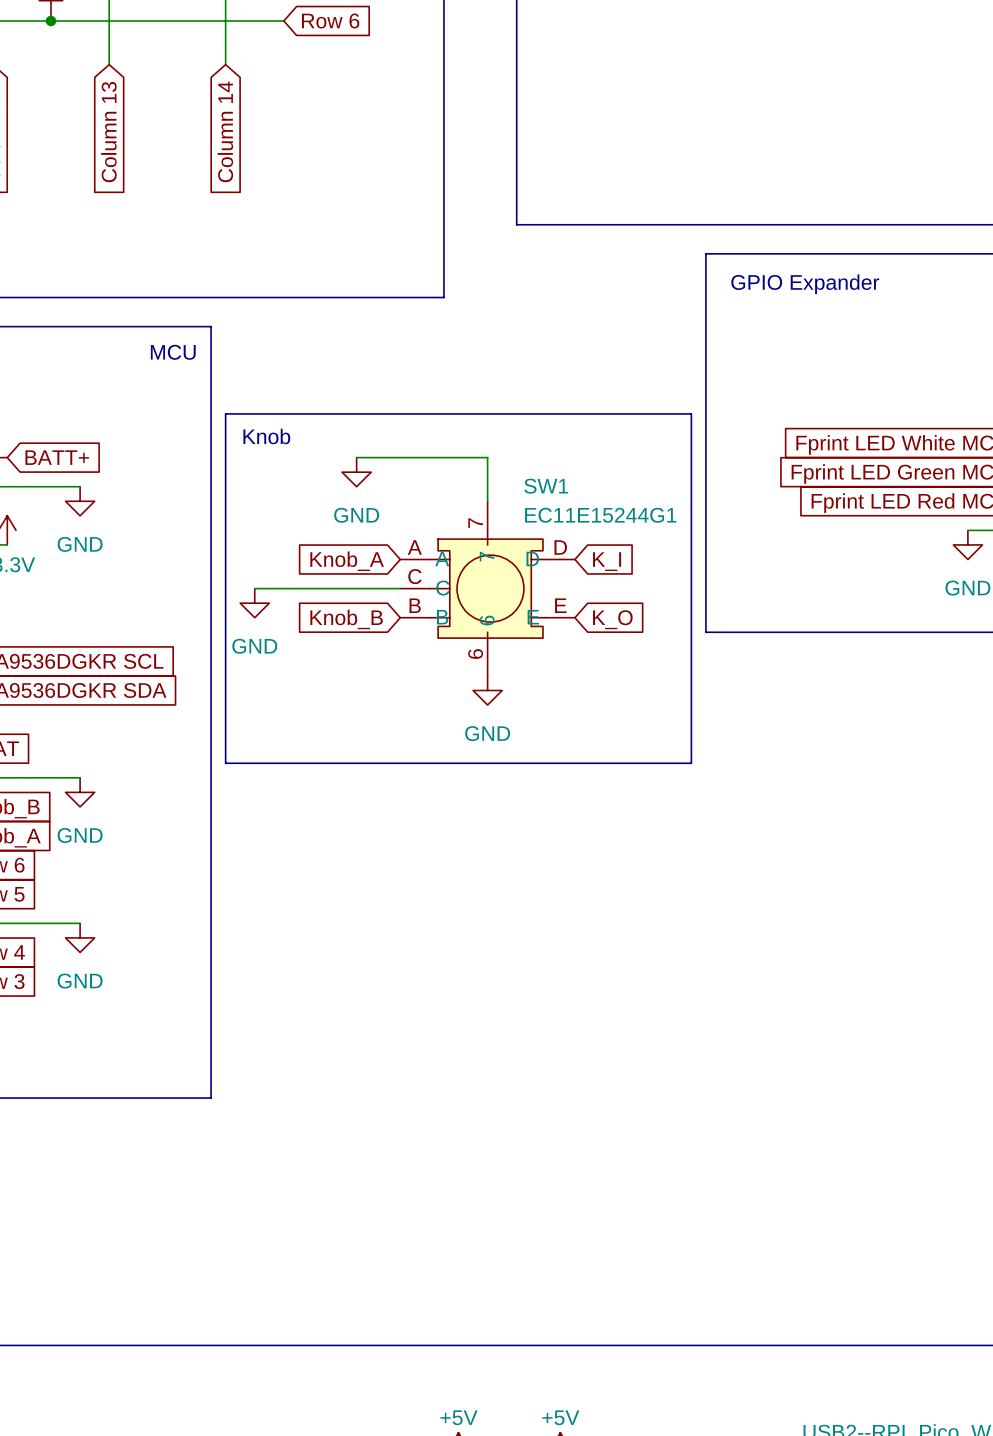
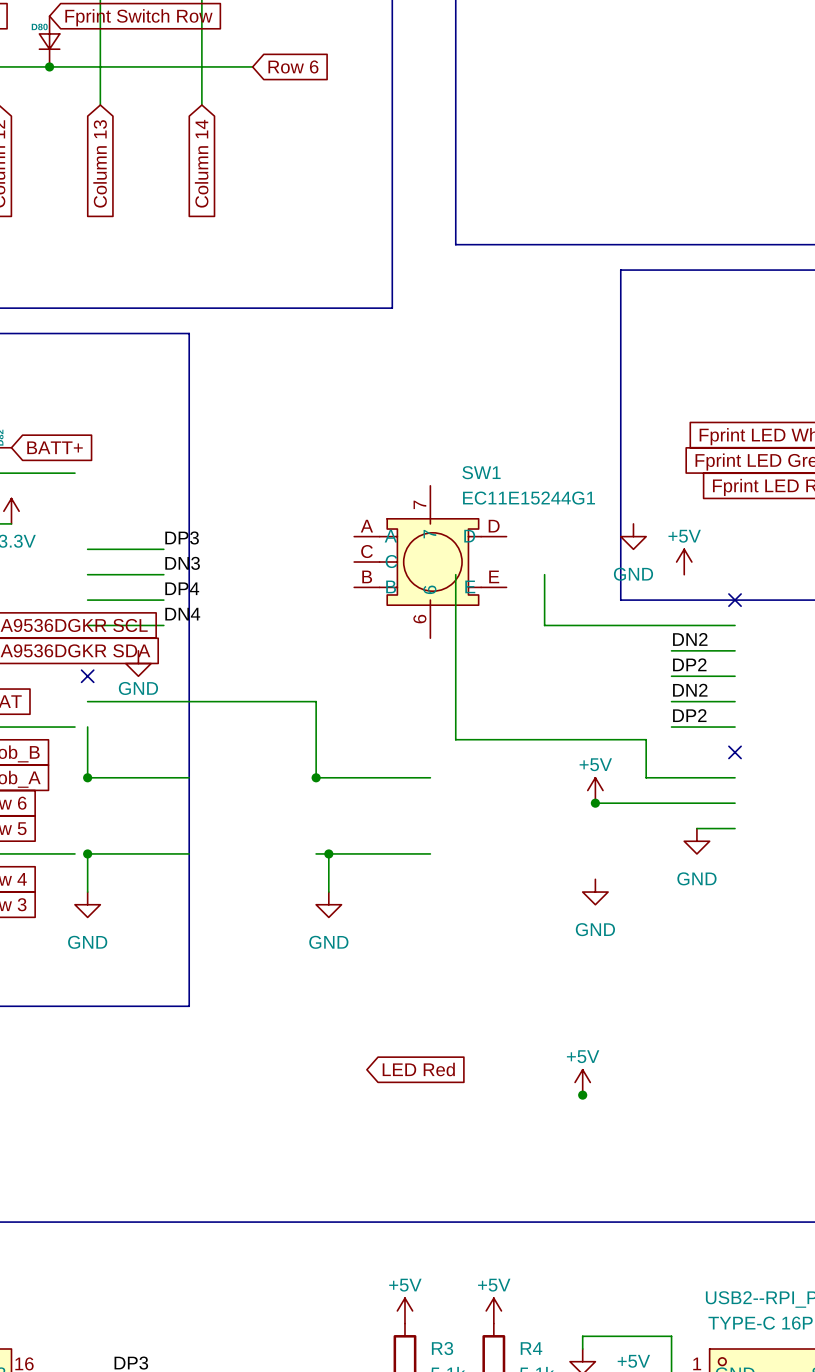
text: GPIO Expander (805, 284) -> none
text: MCU (173, 352) -> none
line: (225, 413) (691, 413) (691, 763) (225, 763) (225, 413) -> none
text: Knob (266, 436) -> none
wire: (356, 457) (487, 457) (487, 501) -> none
power symbol: GND (356, 472) -> none
power symbol: GND (80, 501) -> none
power symbol: none -> GND (633, 536)
label: none -> DP3 (182, 537)
global label: Knob_A (347, 561) -> none
global label: K_I (607, 561) -> none
wire: none -> (87, 549) (163, 549)
wire: (254, 588) (400, 588) -> none
power symbol: none -> +5V (684, 562)
label: none -> DN3 (182, 563)
wire: none -> (87, 574) (163, 574)
power symbol: GND (254, 603) -> none
wire: none -> (455, 574) (455, 739) (646, 739) (646, 777) (735, 777)
wire: none -> (544, 574) (544, 625) (735, 625)
label: none -> DP4 (182, 588)
global label: Knob_B (346, 619) -> none
global label: K_O (612, 619) -> none
wire: none -> (87, 600) (163, 600)
no-connect mark: none -> (735, 600)
label: none -> DN4 (182, 614)
wire: none -> (87, 625) (163, 625)
label: none -> DN2 (690, 639)
power symbol: GND (487, 690) -> none
wire: none -> (671, 650) (735, 650)
power symbol: none -> GND (138, 663)
label: none -> DP2 (689, 664)
no-connect mark: none -> (87, 676)
wire: none -> (671, 676) (735, 676)
label: none -> DN2 (690, 690)
wire: none -> (87, 701) (316, 701) (316, 777) (430, 777)
wire: none -> (671, 701) (735, 701)
label: none -> DP2 (689, 715)
wire: none -> (87, 727) (87, 777) (189, 777)
wire: none -> (671, 727) (735, 727)
power symbol: GND (80, 792) -> none
no-connect mark: none -> (735, 752)
junction: none -> (87, 777)
junction: none -> (316, 777)
power symbol: none -> +5V (595, 790)
wire: none -> (595, 803) (735, 803)
junction: none -> (595, 803)
wire: none -> (696, 828) (735, 828)
power symbol: none -> GND (696, 841)
junction: none -> (87, 853)
wire: none -> (189, 853) (87, 853) (87, 892)
wire: none -> (316, 853) (430, 853)
wire: none -> (328, 853) (328, 892)
junction: none -> (328, 853)
power symbol position: GND (80, 937) -> GND (87, 904)
power symbol: none -> GND (595, 892)
power symbol: none -> GND (328, 904)
global label: none -> LED Red (418, 1069)
power symbol: none -> +5V (582, 1082)
junction: none -> (582, 1095)

